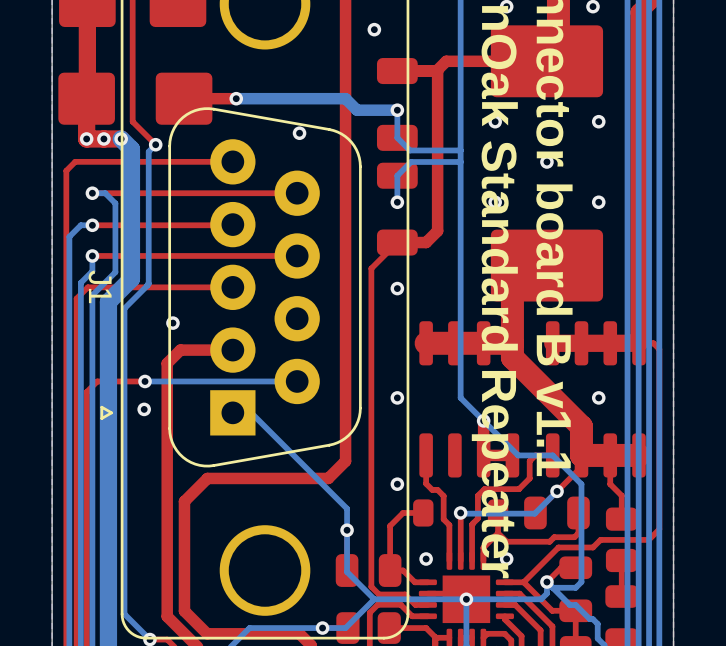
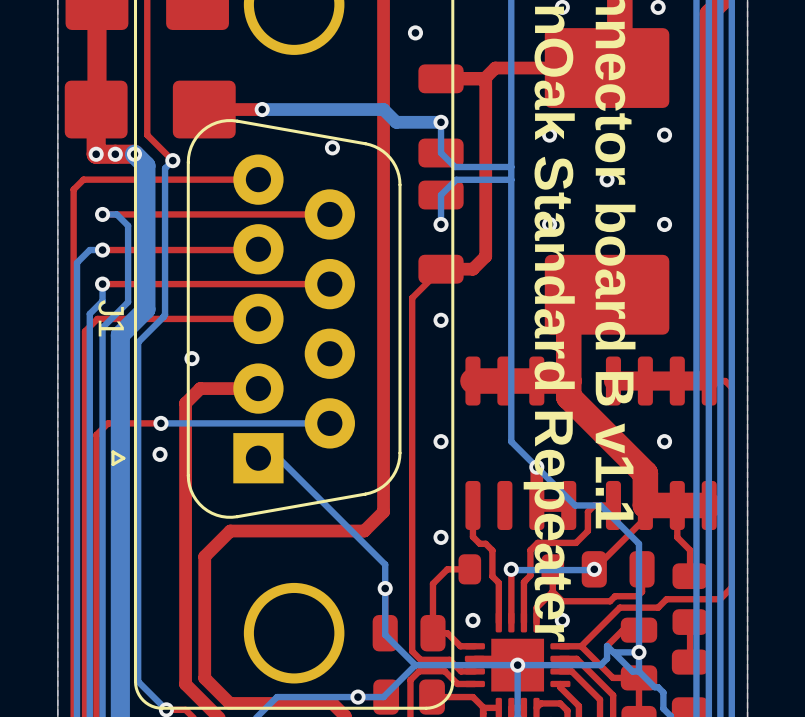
bottom track: (541, 455) (552, 455) (581, 484) (581, 582) (575, 587) -> (600, 505) (638, 543) (638, 671)
bottom track: (557, 491) (535, 512) -> none
via position: (557, 491) -> (594, 569)
via position: (546, 582) -> (638, 652)

